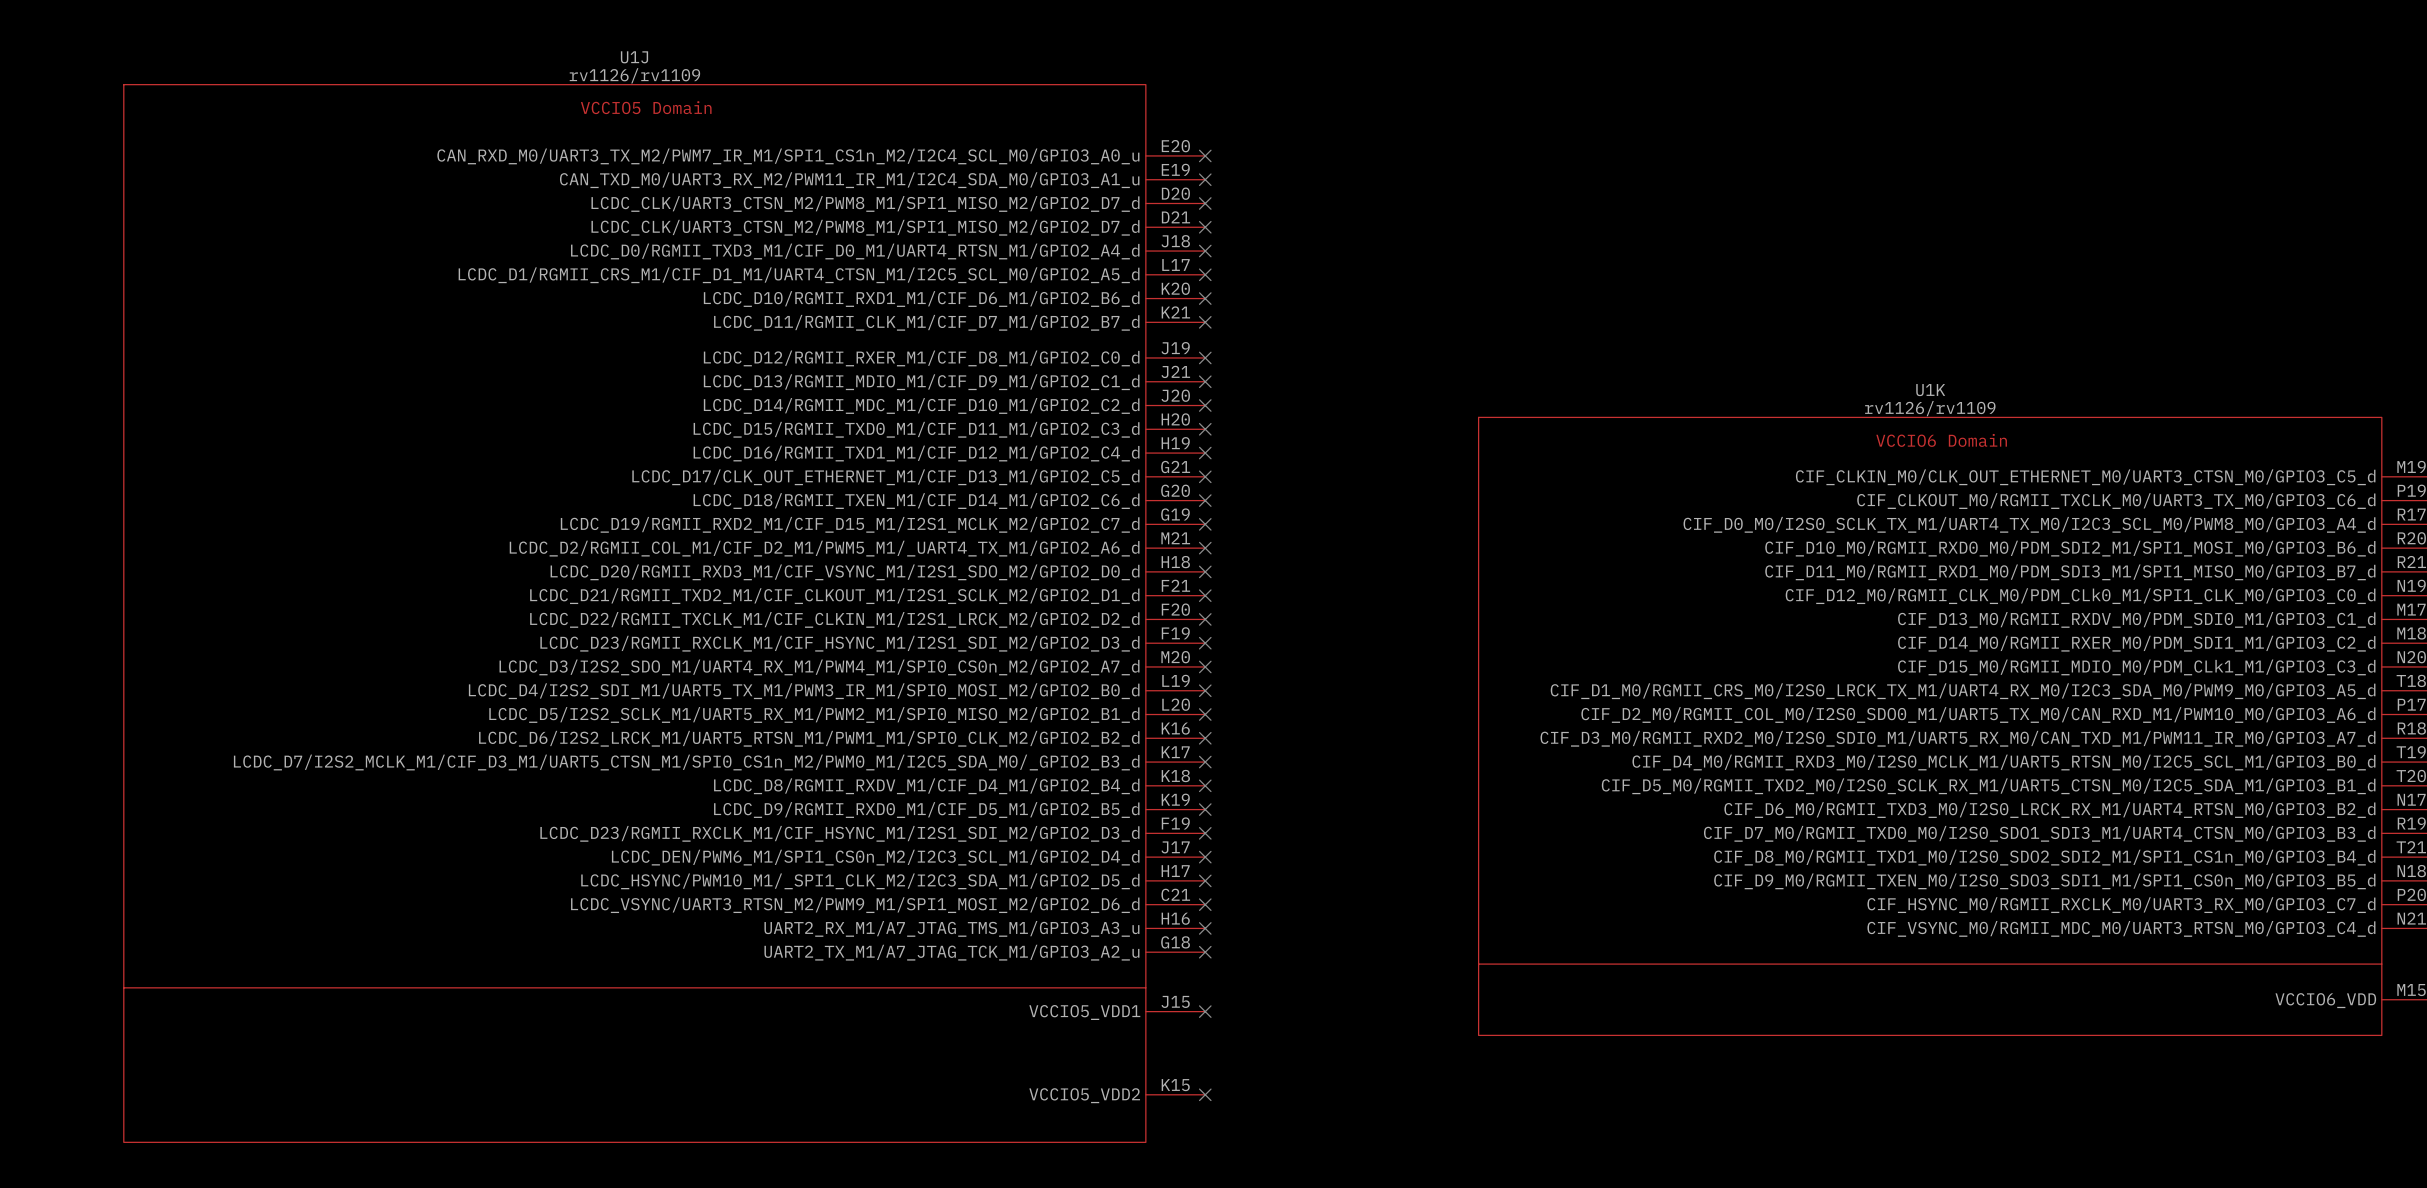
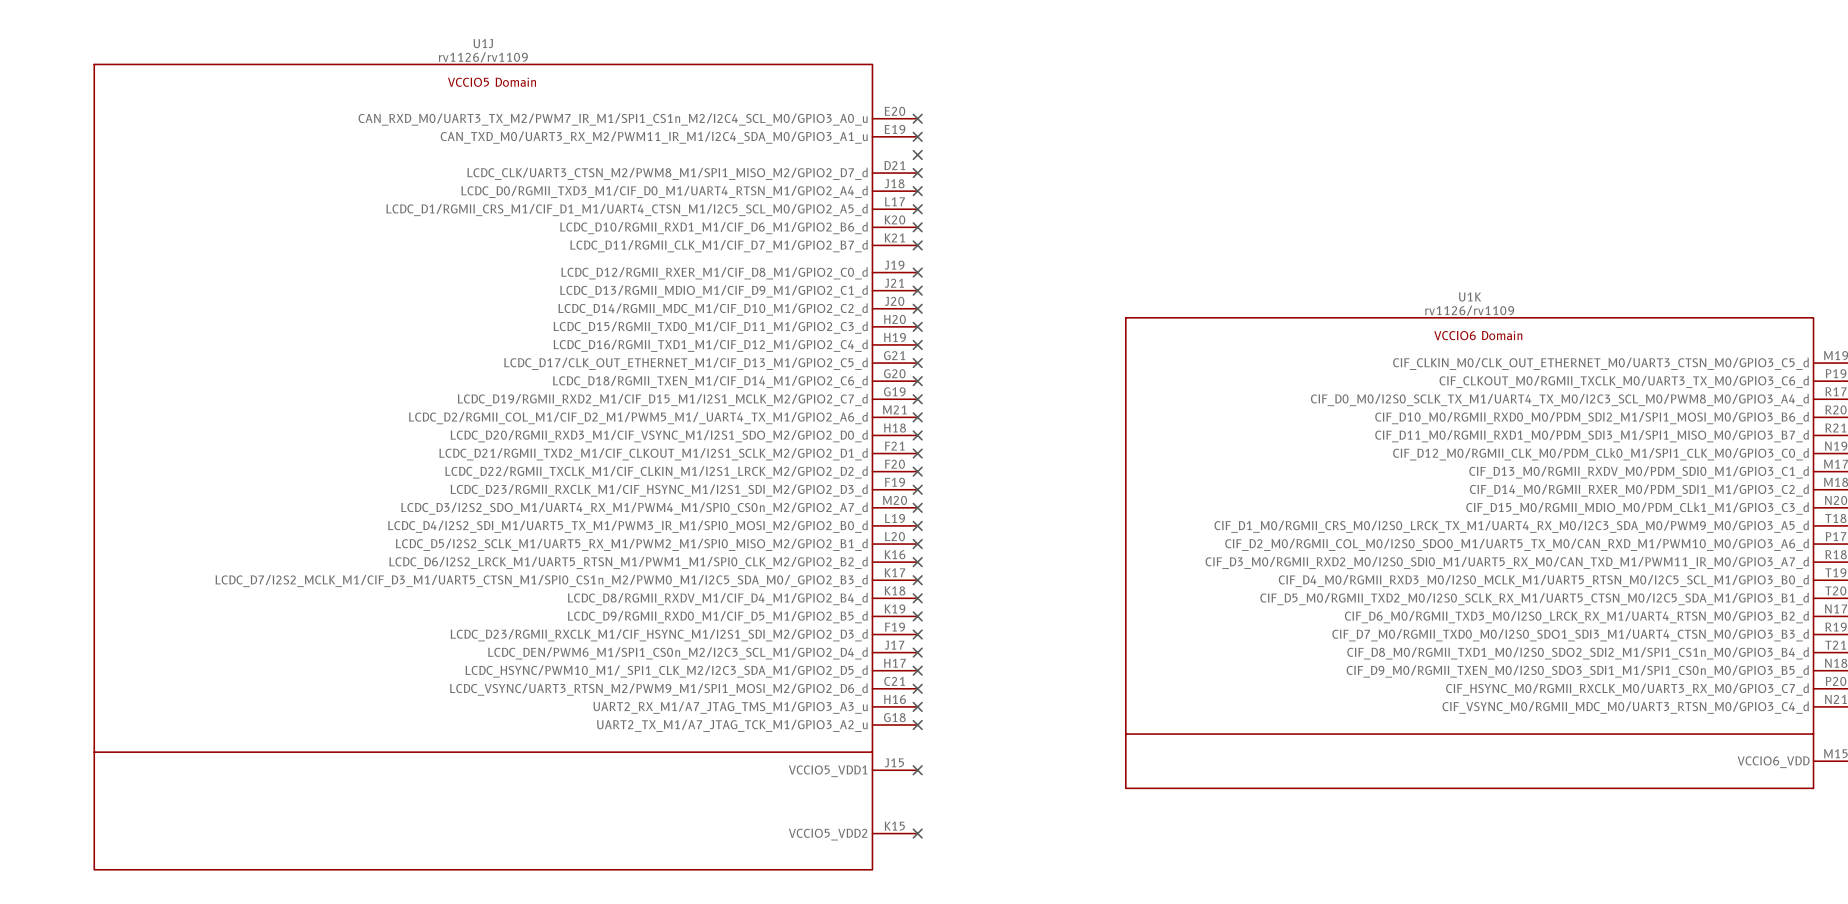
U1J symbol: [123, 84, 1206, 1143] -> [94, 64, 918, 870]

